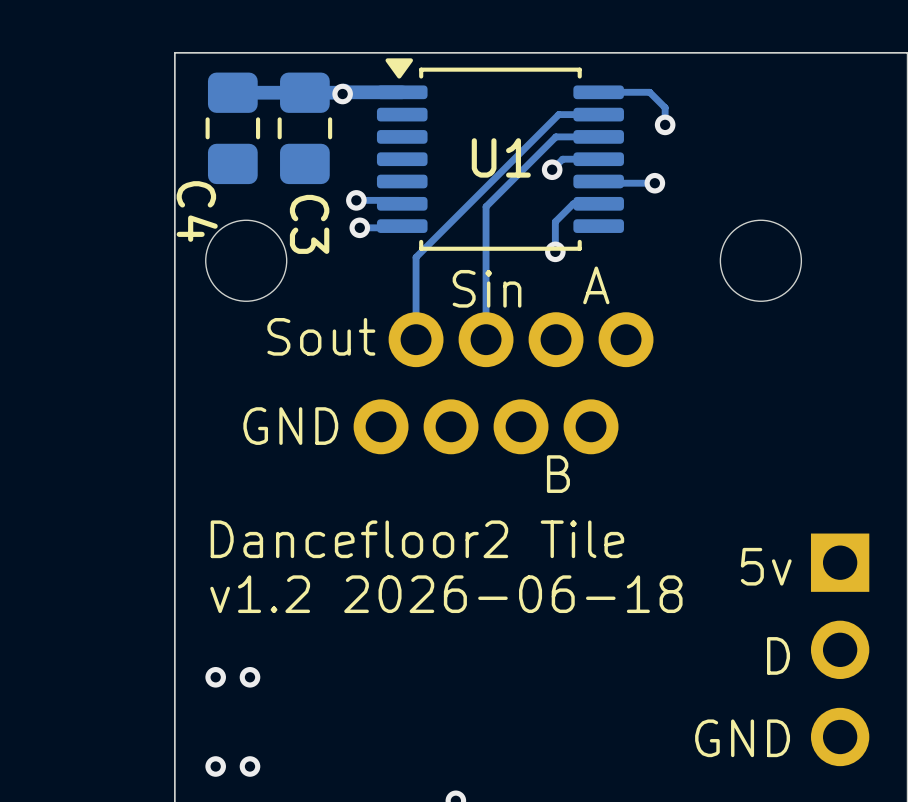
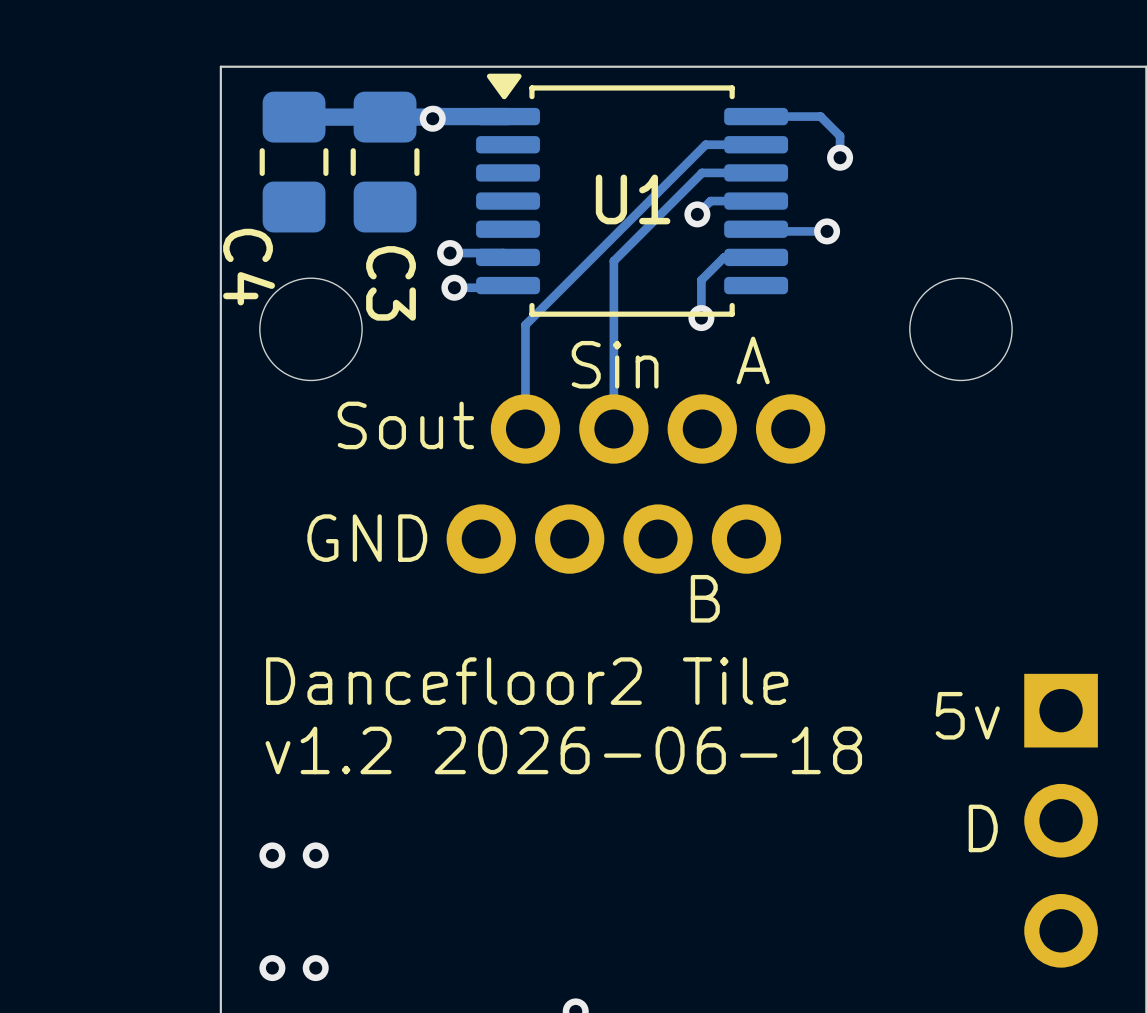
text: GND (742, 738) -> none

